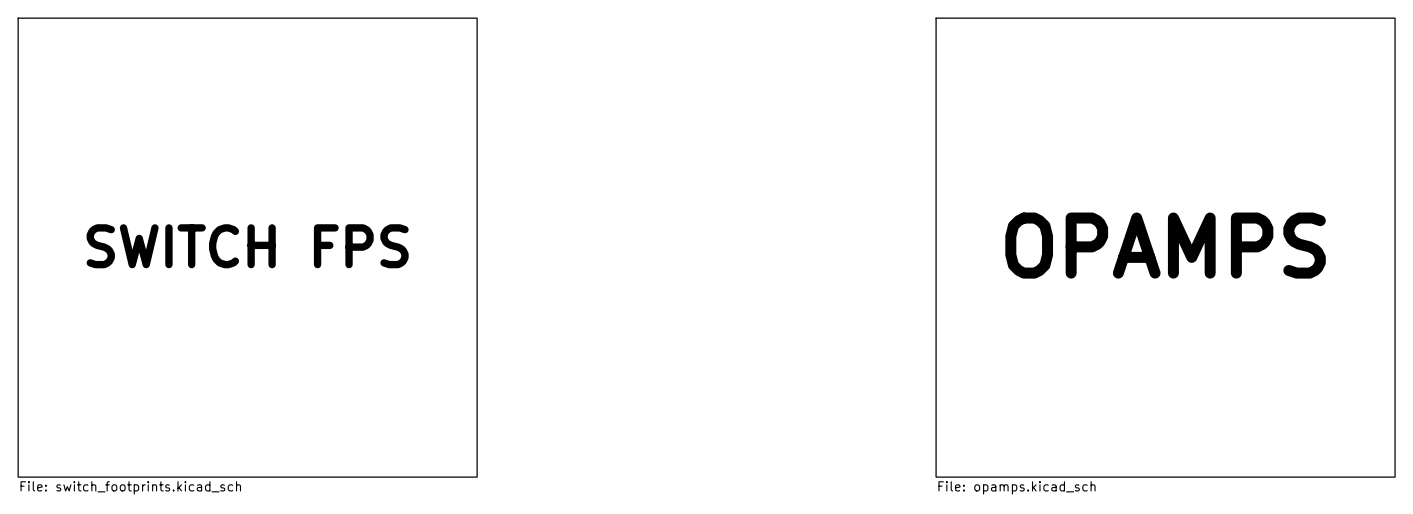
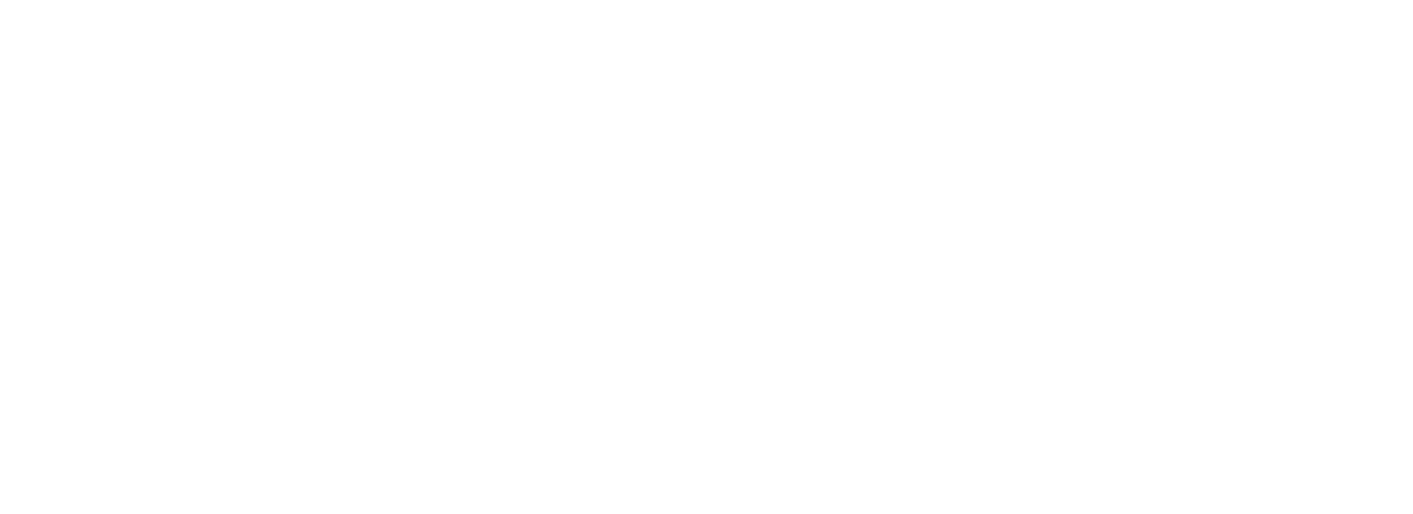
sheet SWITCH FPS: File: switch_footprints.kicad_sch (247, 247) -> none
sheet OPAMPS: File: opamps.kicad_sch (1165, 247) -> none

